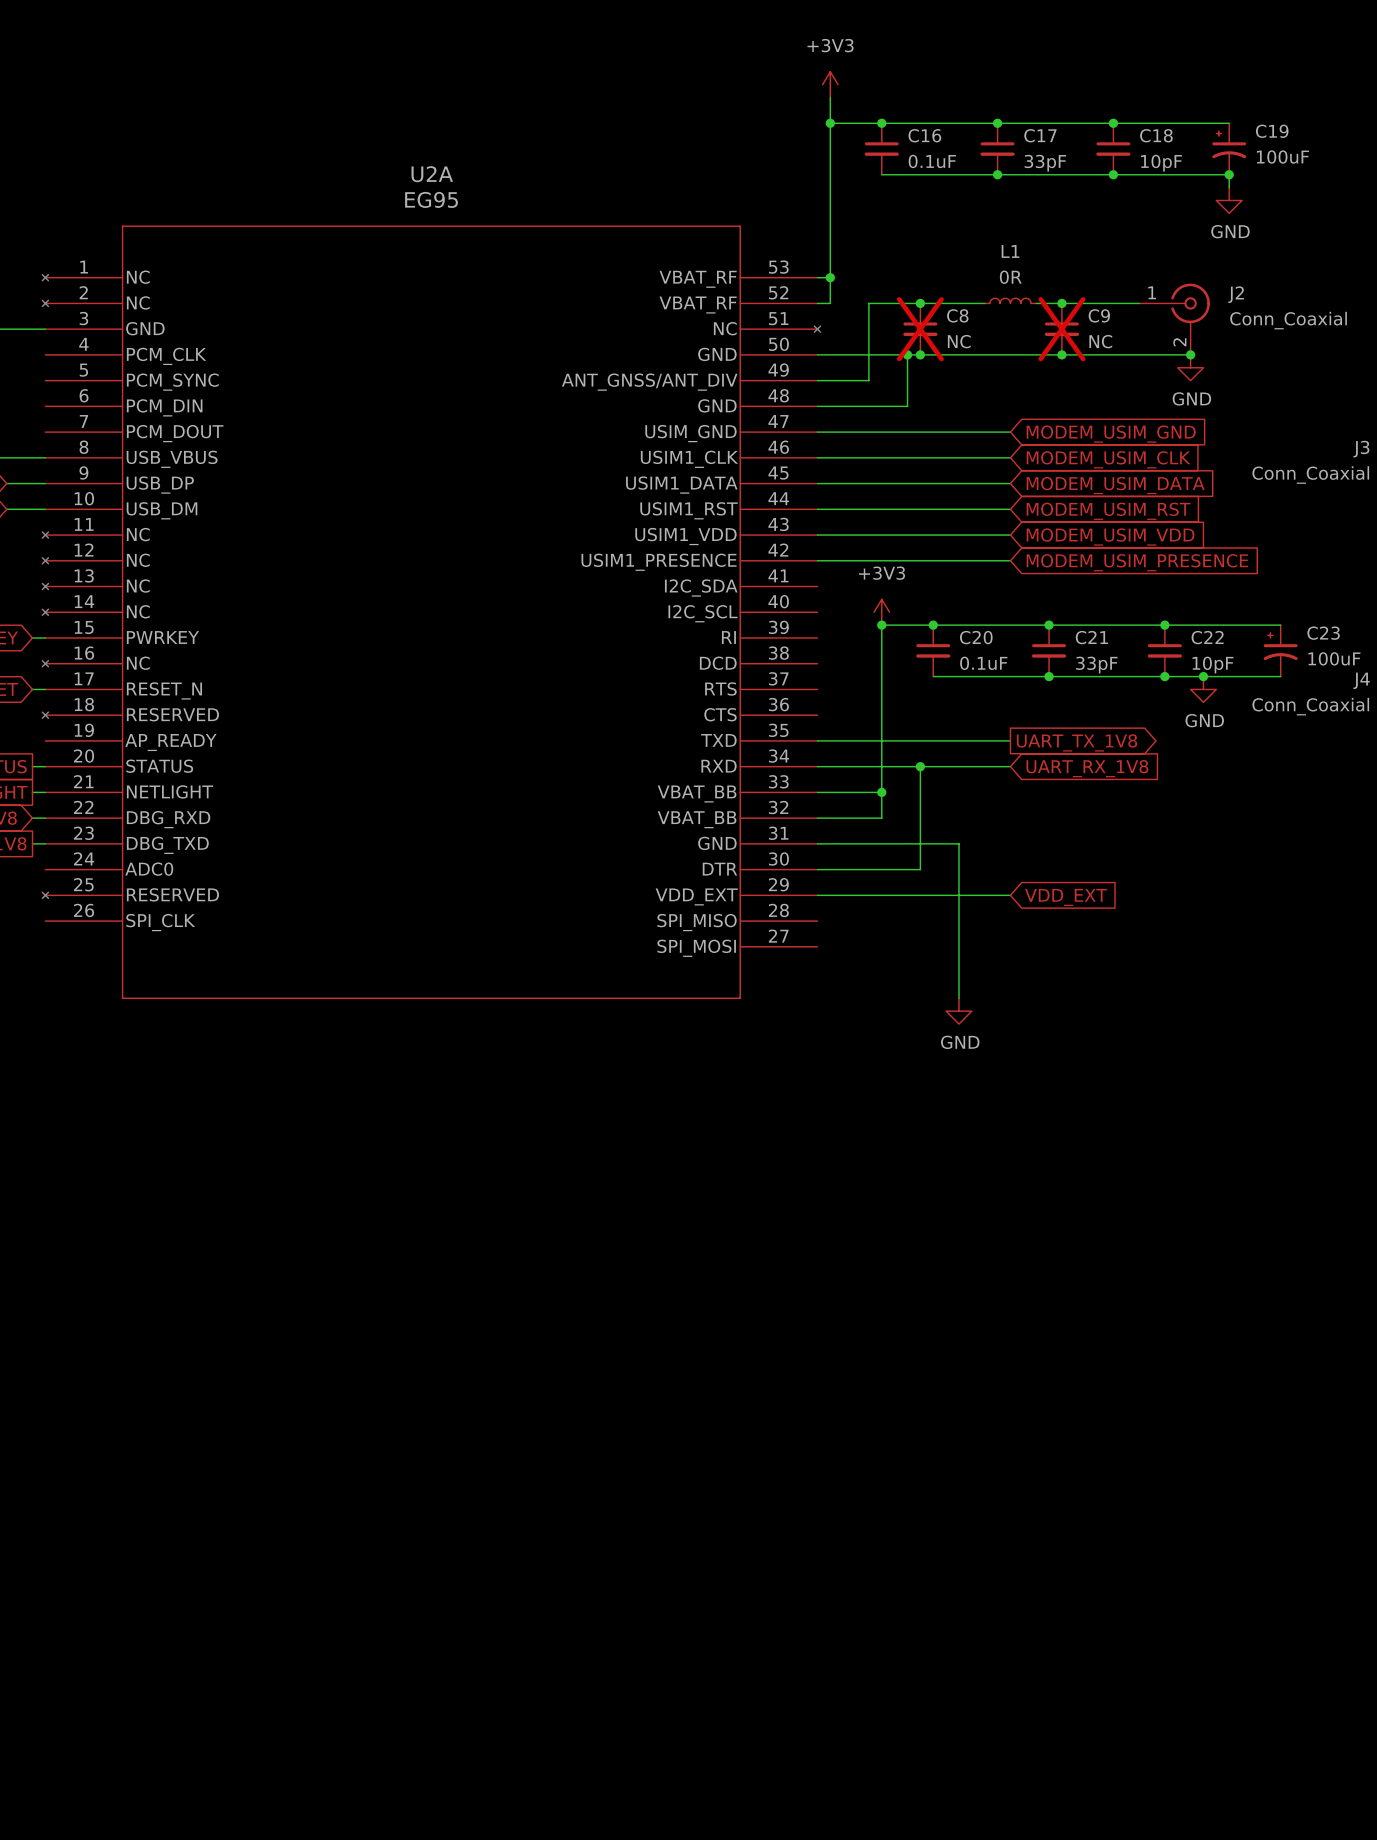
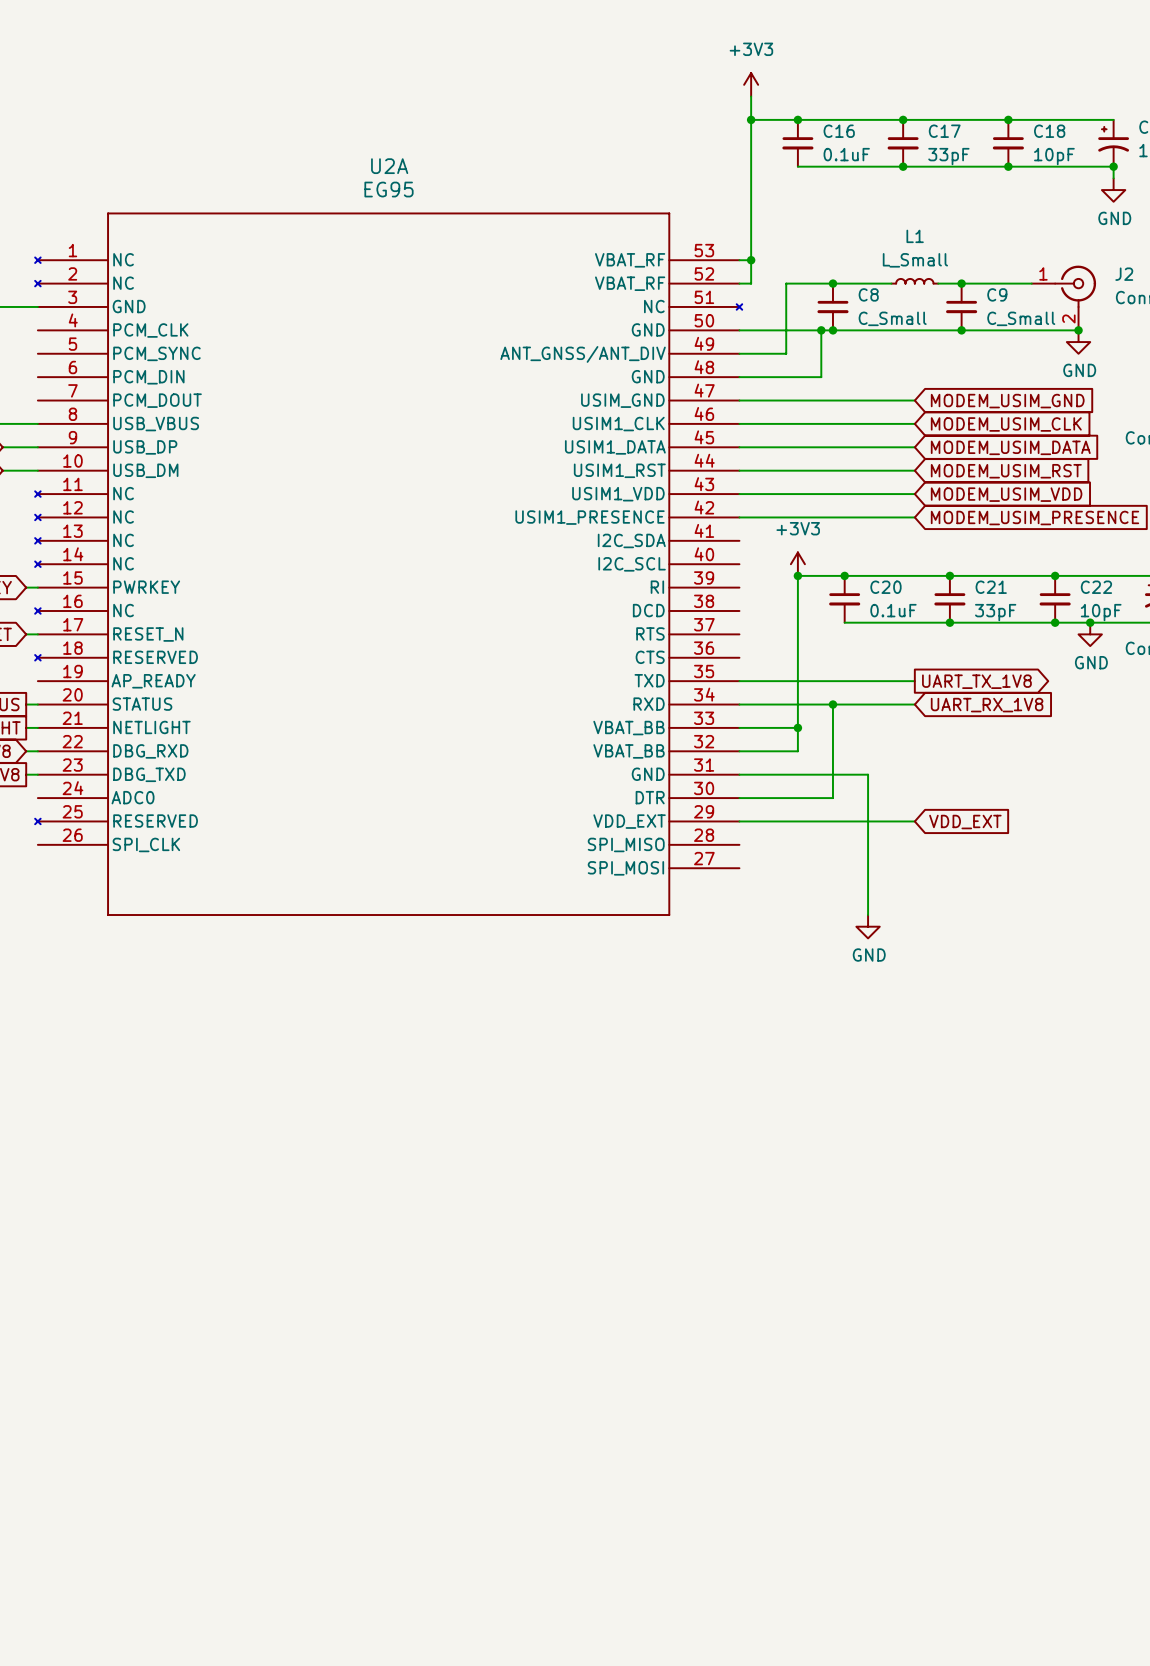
L1 value: 0R (1010, 277) -> L_Small (915, 260)
C8 do-not-place cross: (920, 329) -> none
C9 do-not-place cross: (1061, 329) -> none
C8 value: NC (959, 341) -> C_Small (892, 318)
C9 value: NC (1100, 341) -> C_Small (1021, 318)

